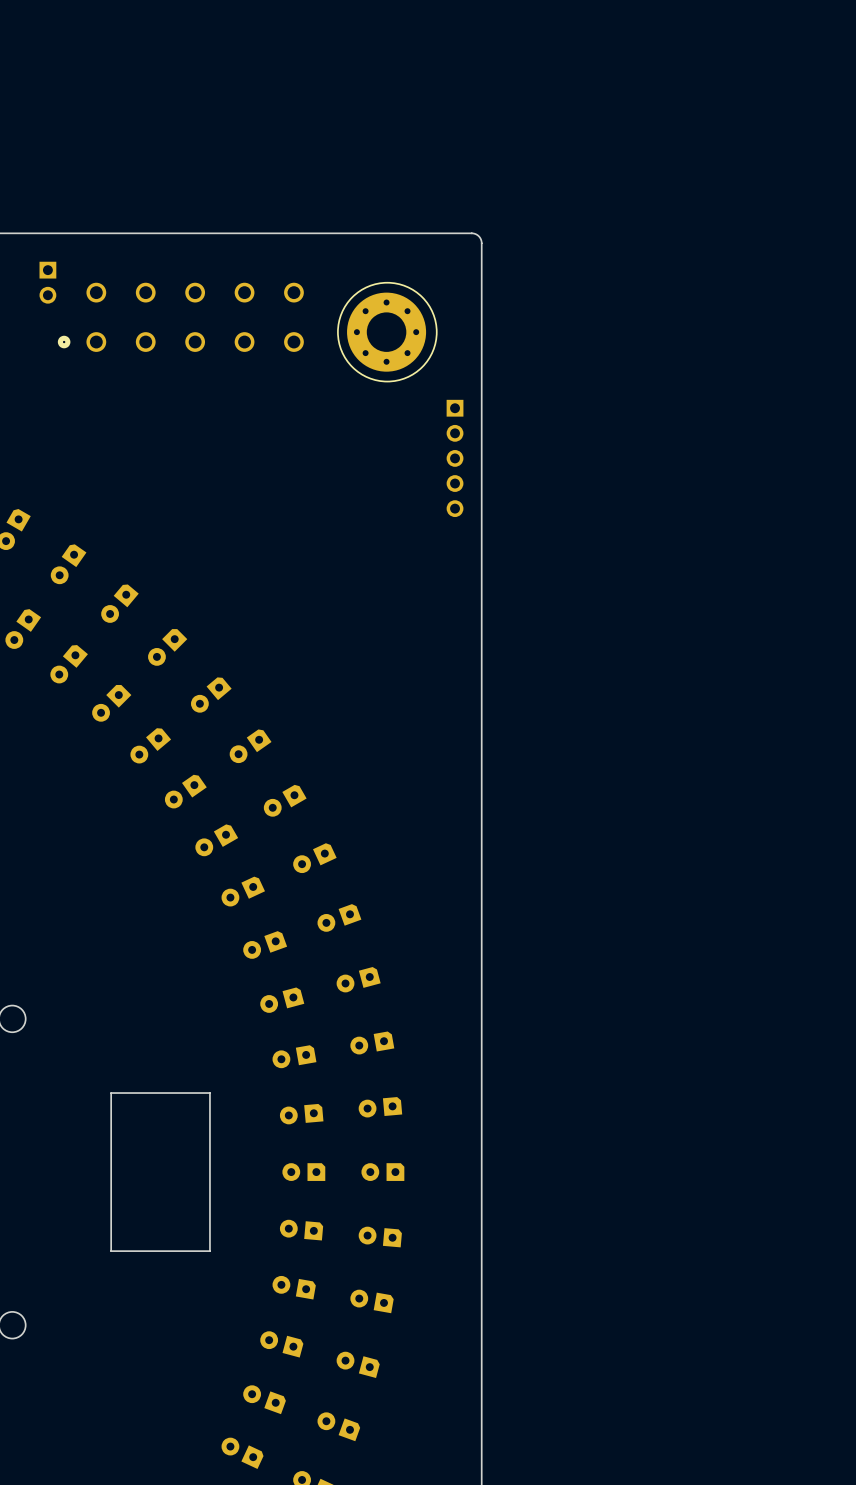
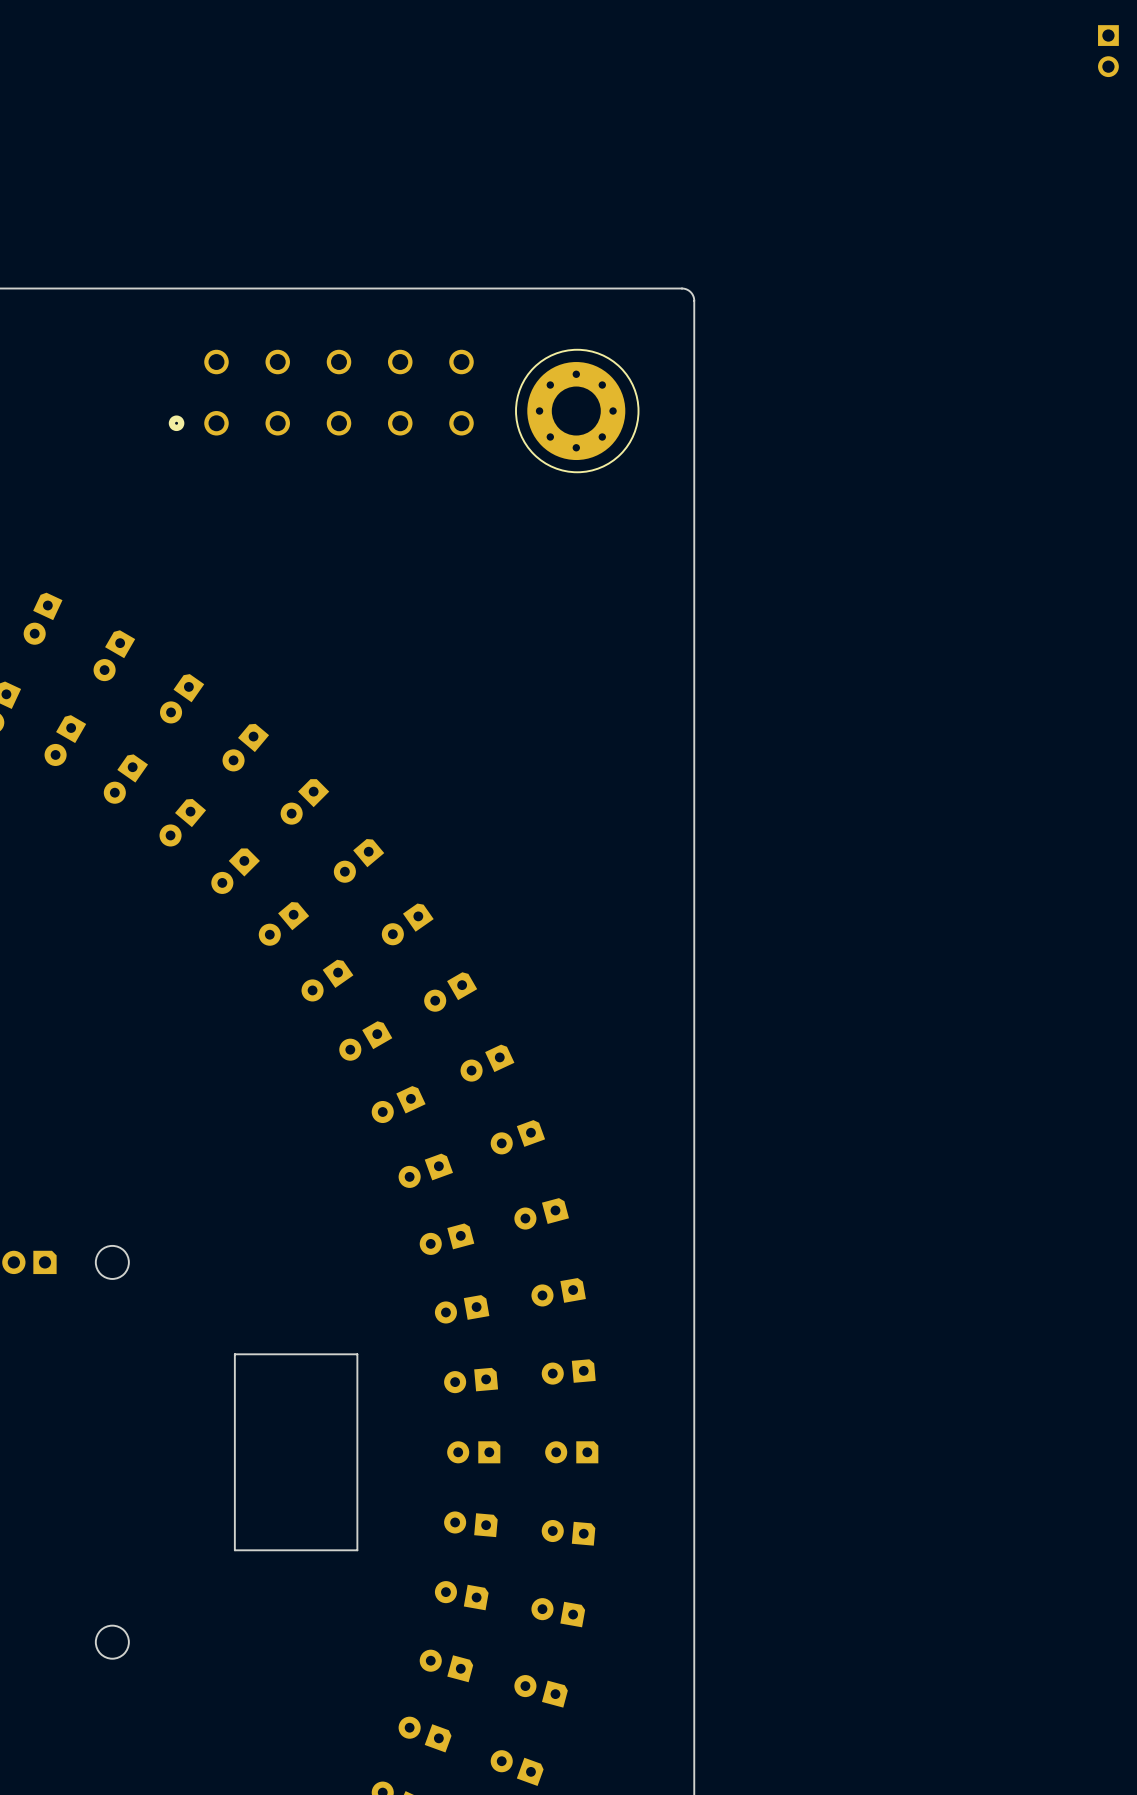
part: none -> (1108, 51)
part: (47, 282) -> none
part: (455, 458) -> none

